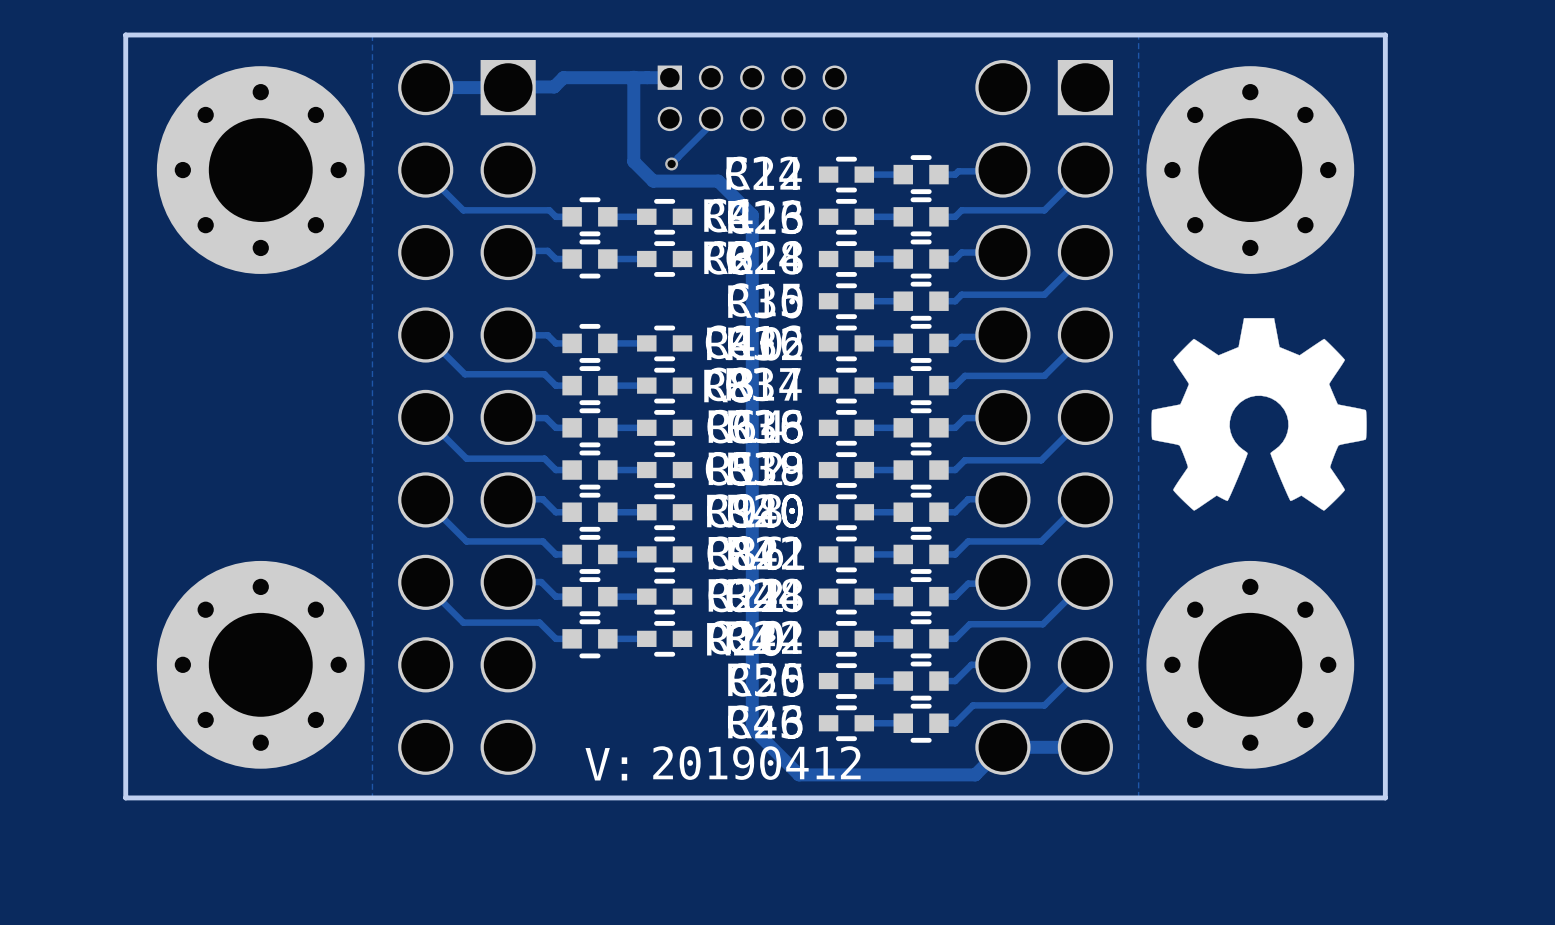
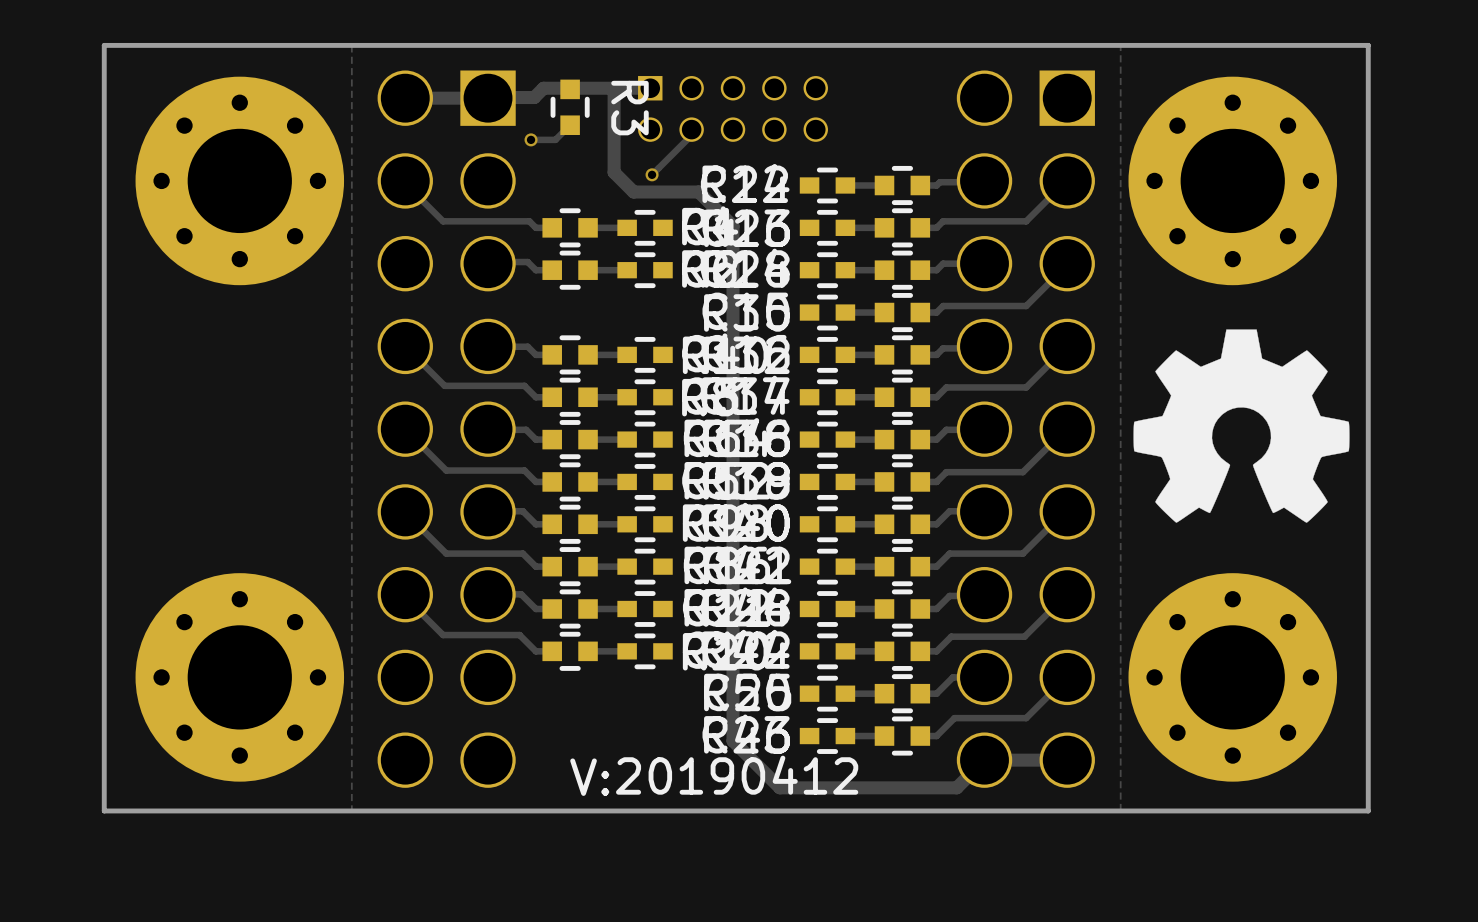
R3: none -> (570, 107)
track: none -> (570, 125) (555, 139) (531, 139)
via: none -> (531, 139)

